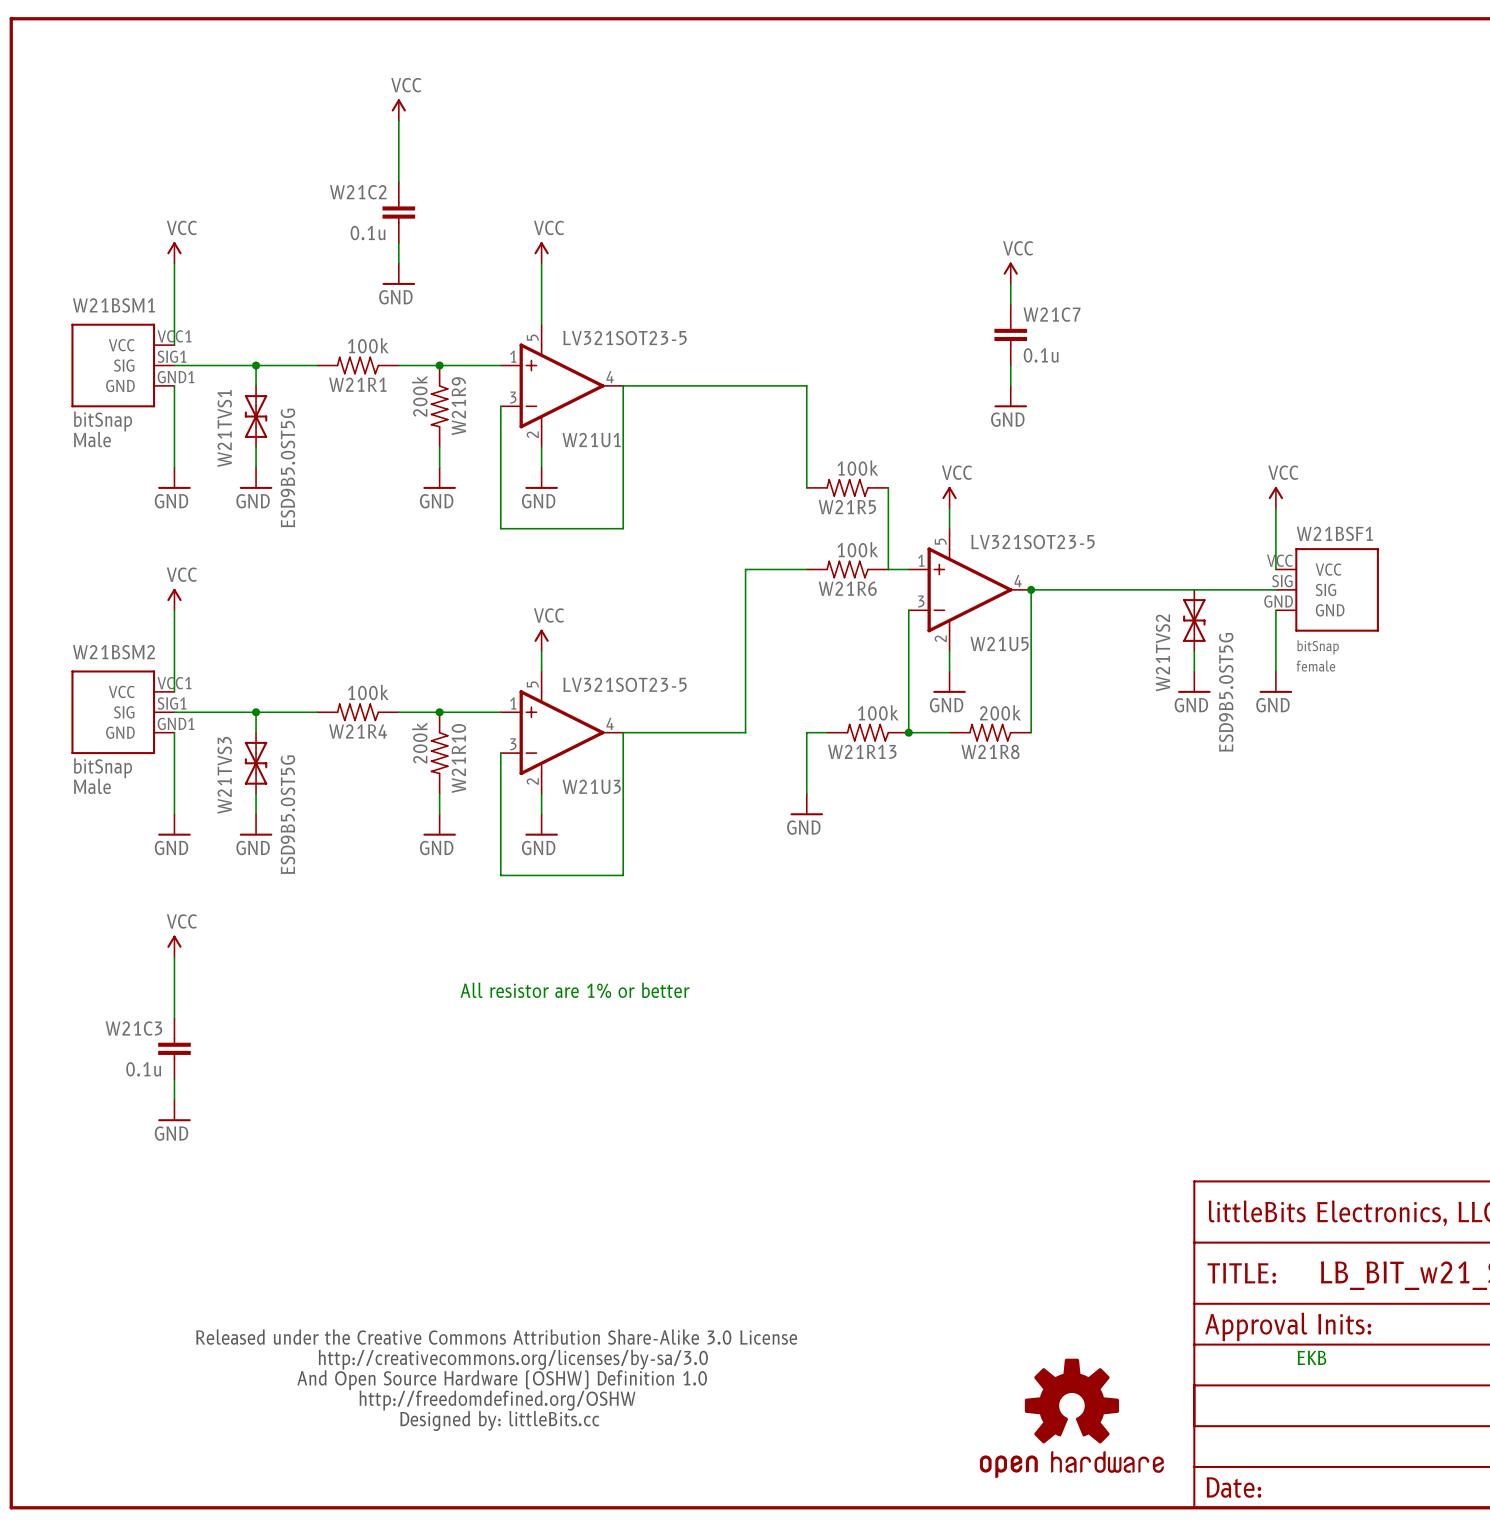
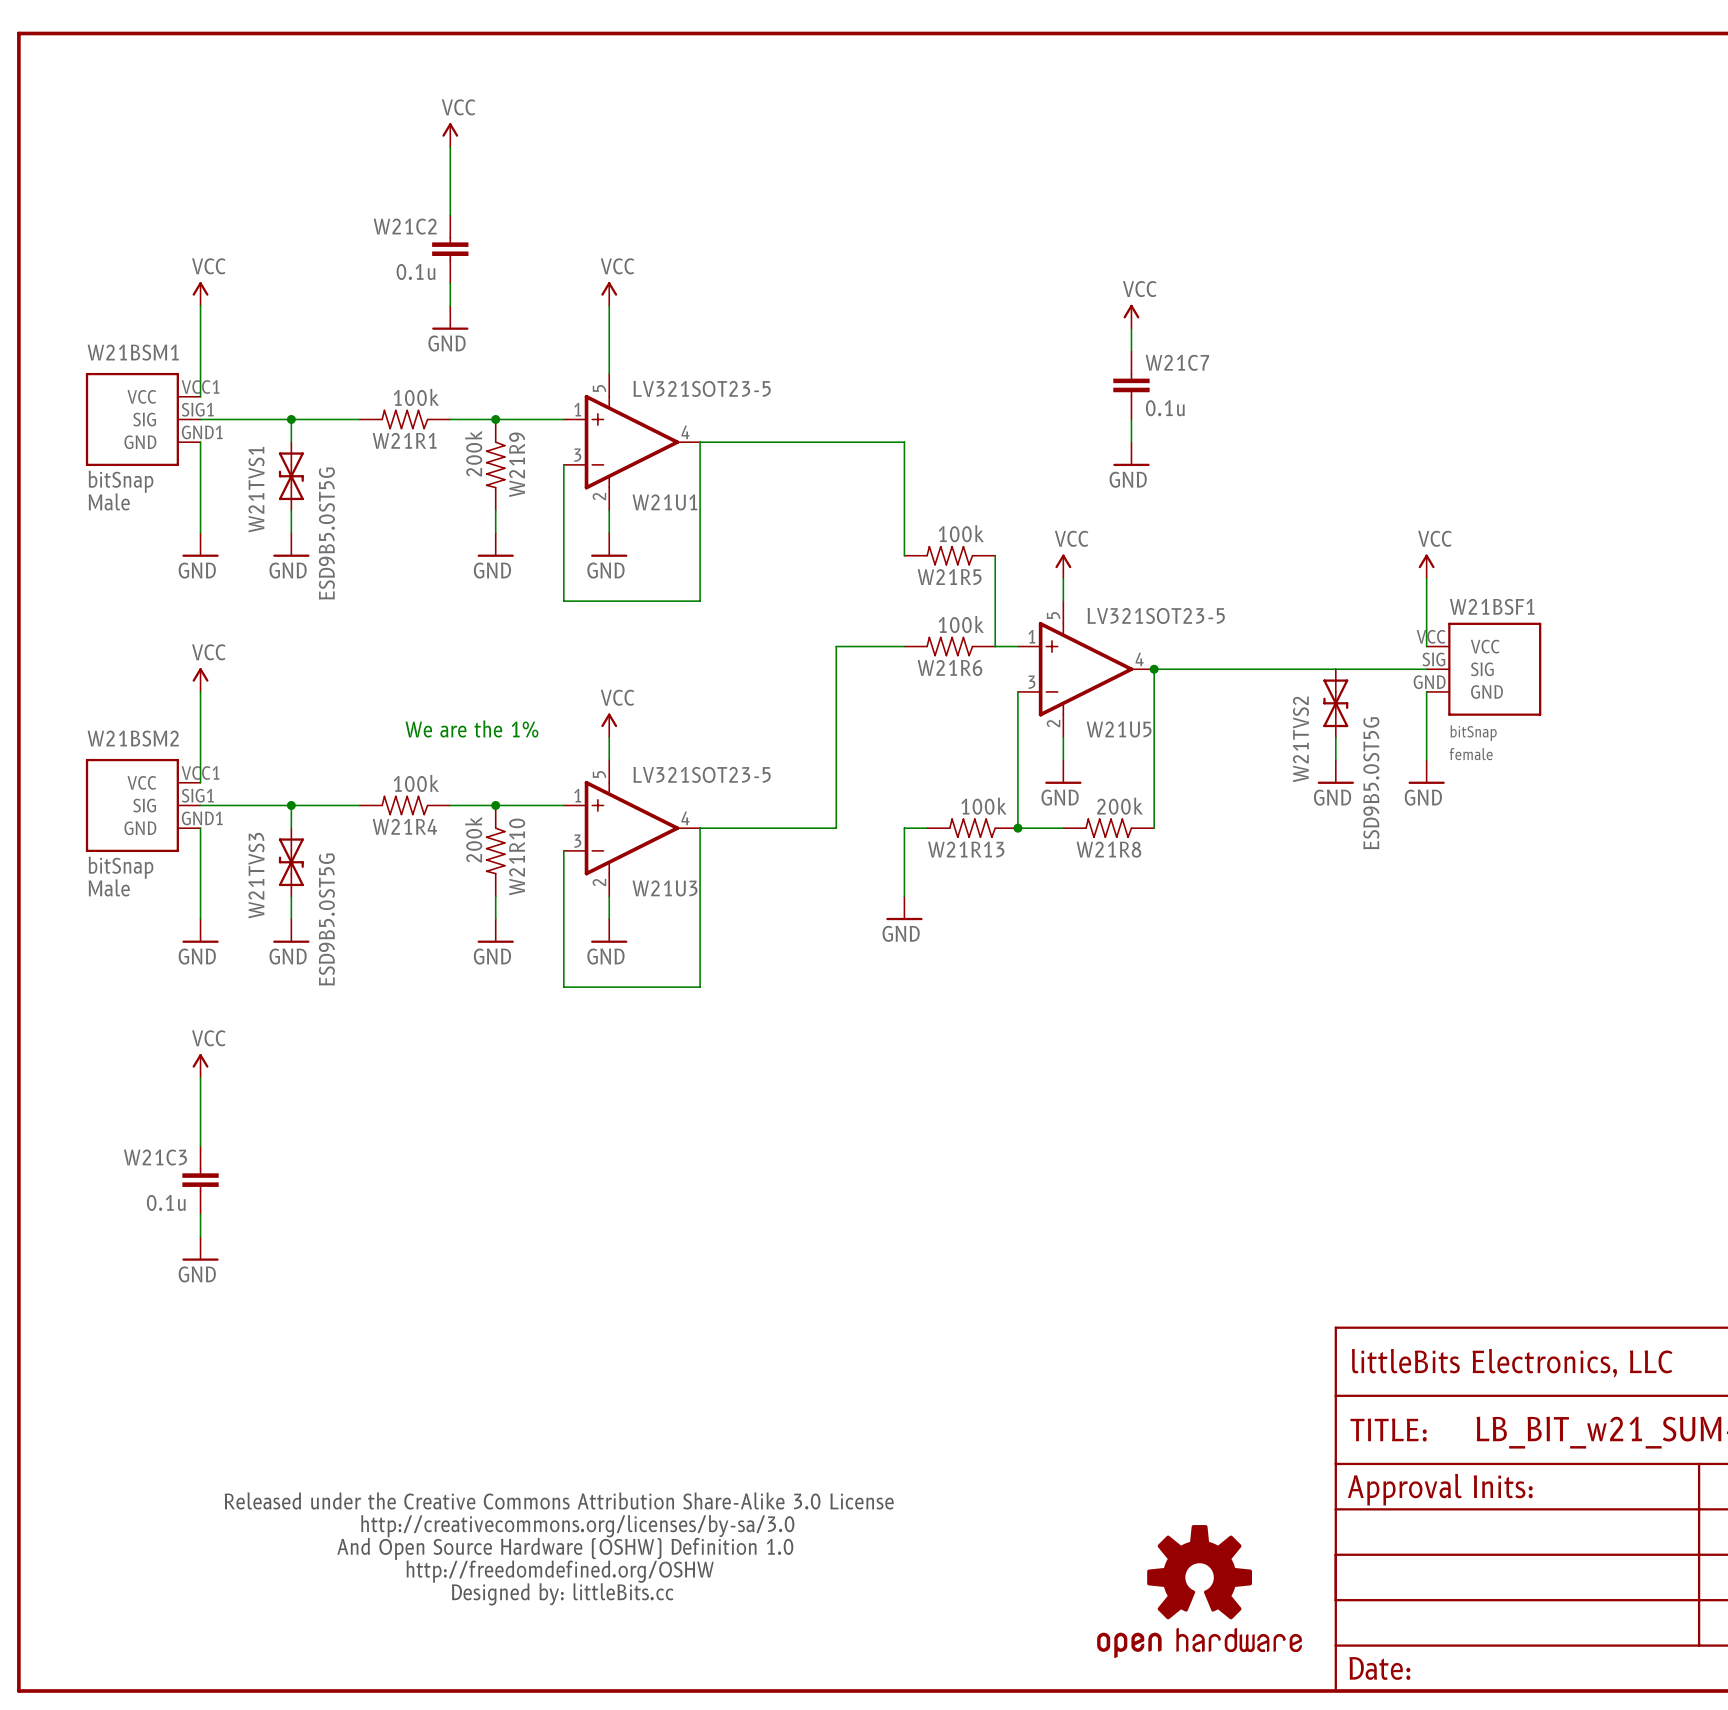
text: none -> We are the 1% (471, 728)
text: All resistor are 1% or better (575, 990) -> none
text: EKB (1311, 1357) -> none

